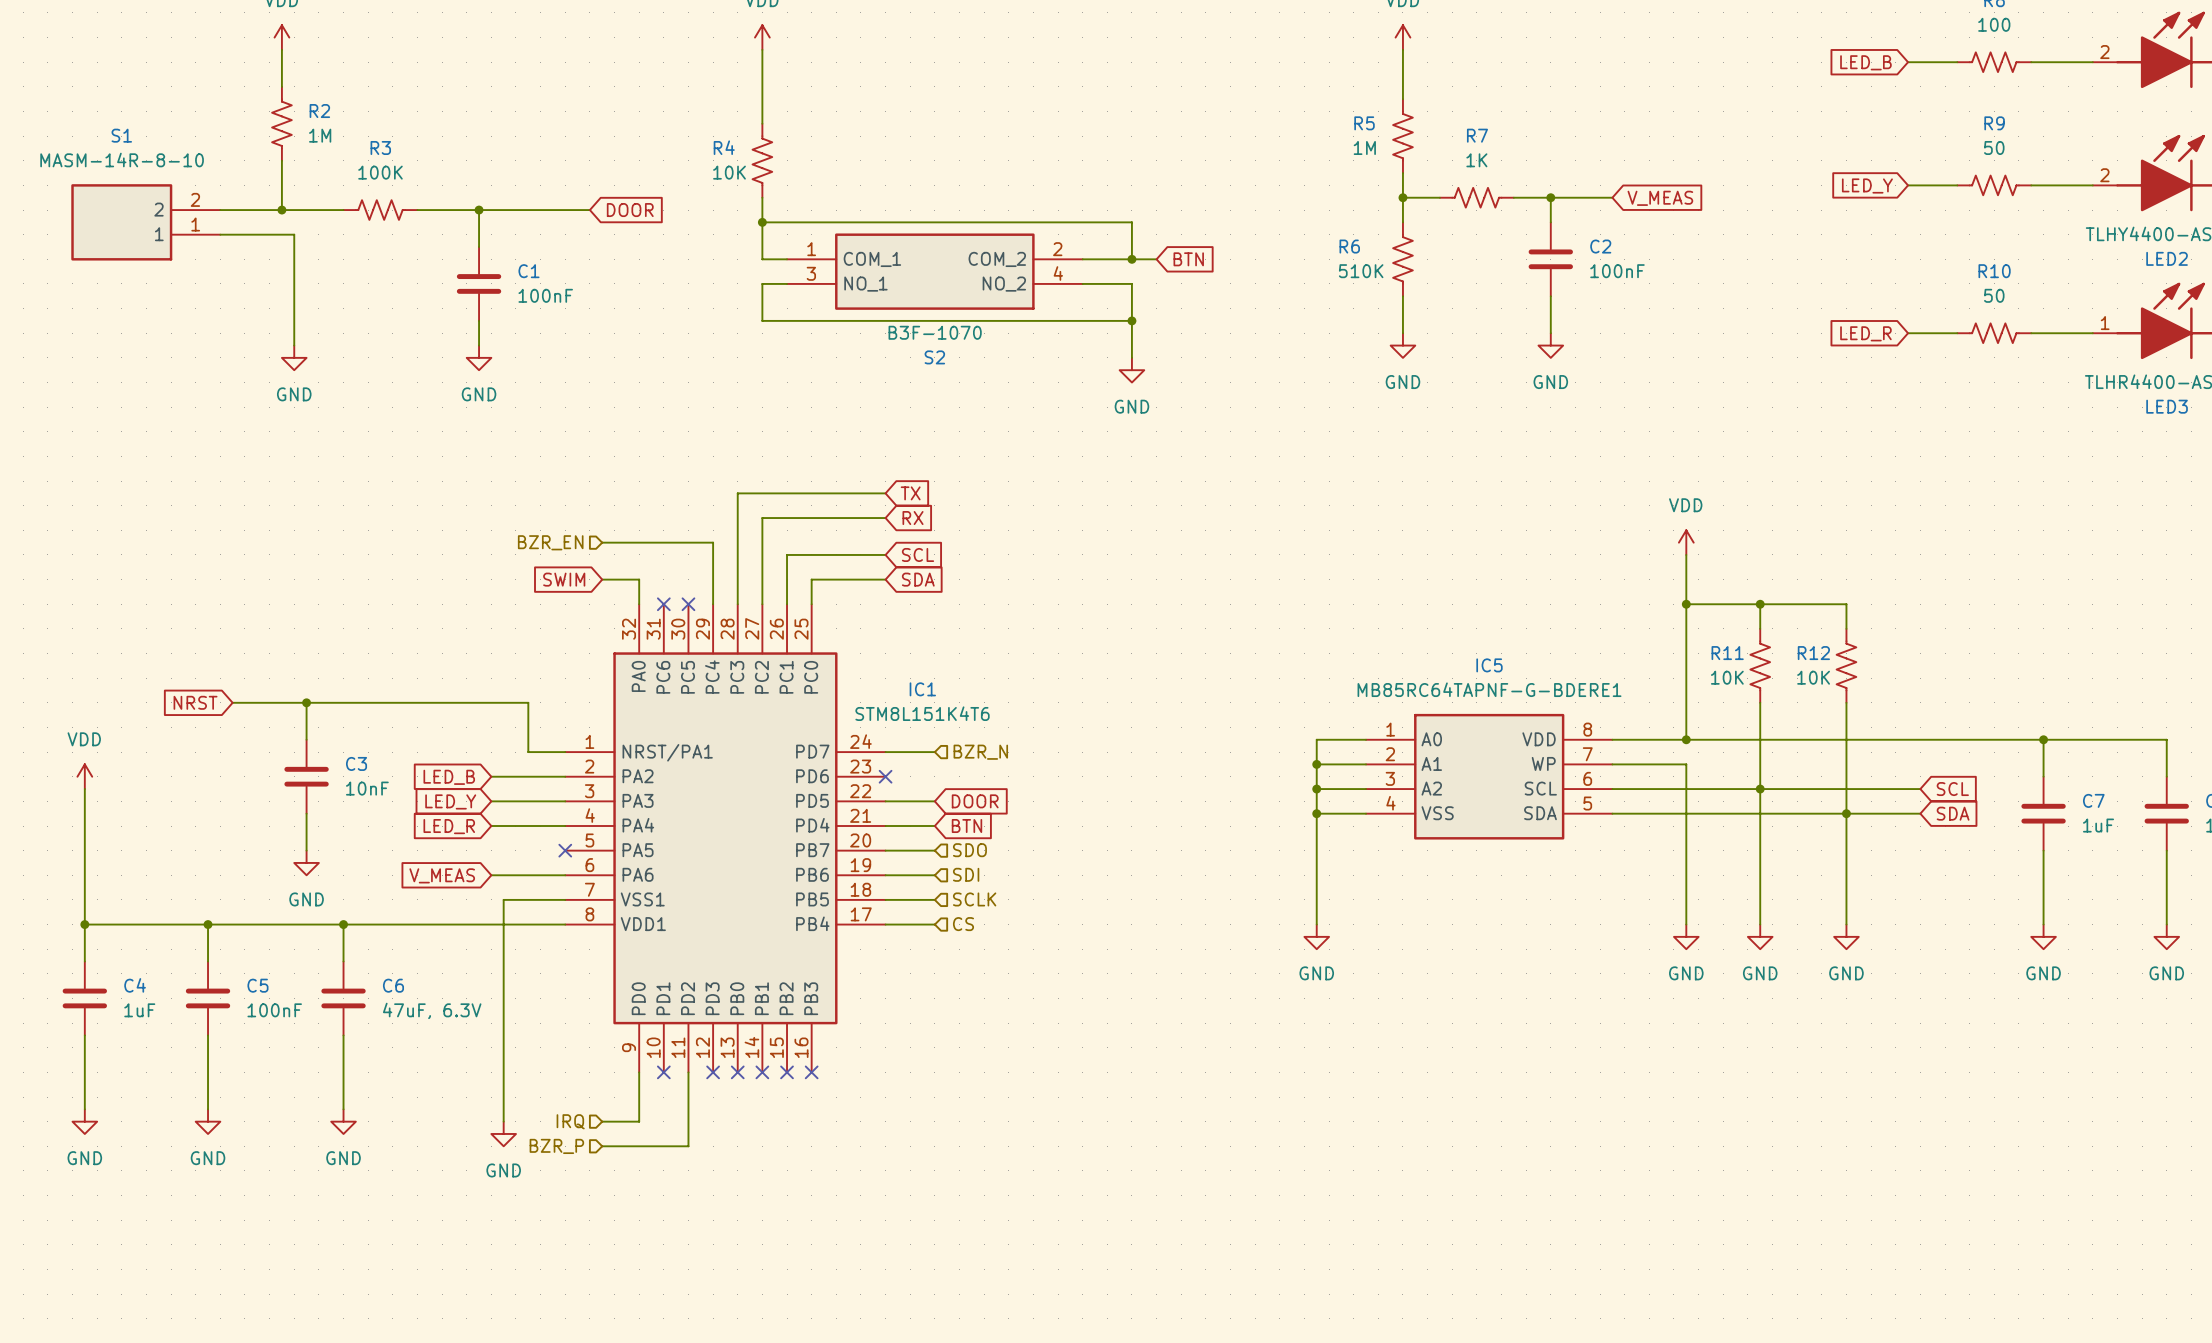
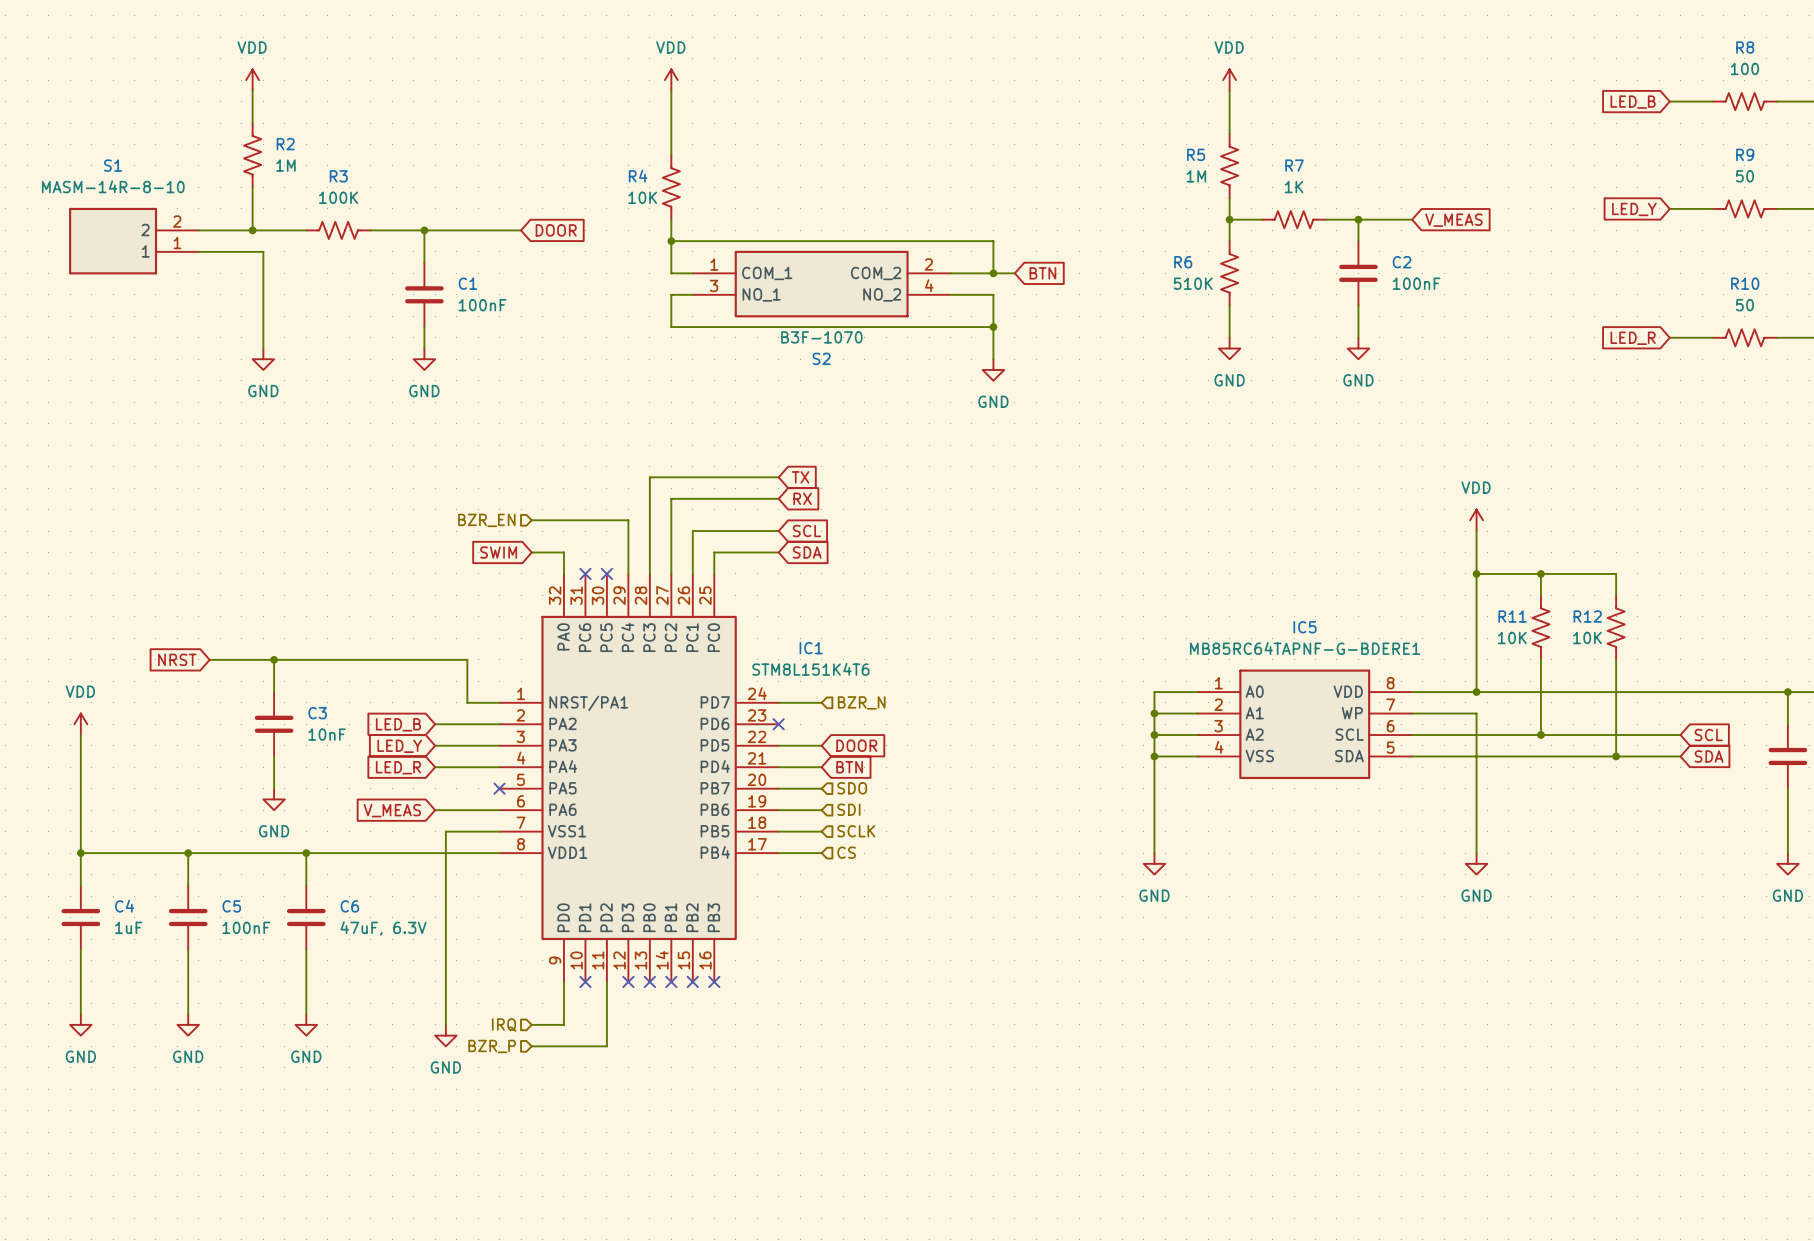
wire: (1760, 789) (1760, 924) -> none
wire: (1846, 813) (1846, 924) -> none
power symbol: GND (1760, 936) -> none
power symbol: GND (1846, 936) -> none

